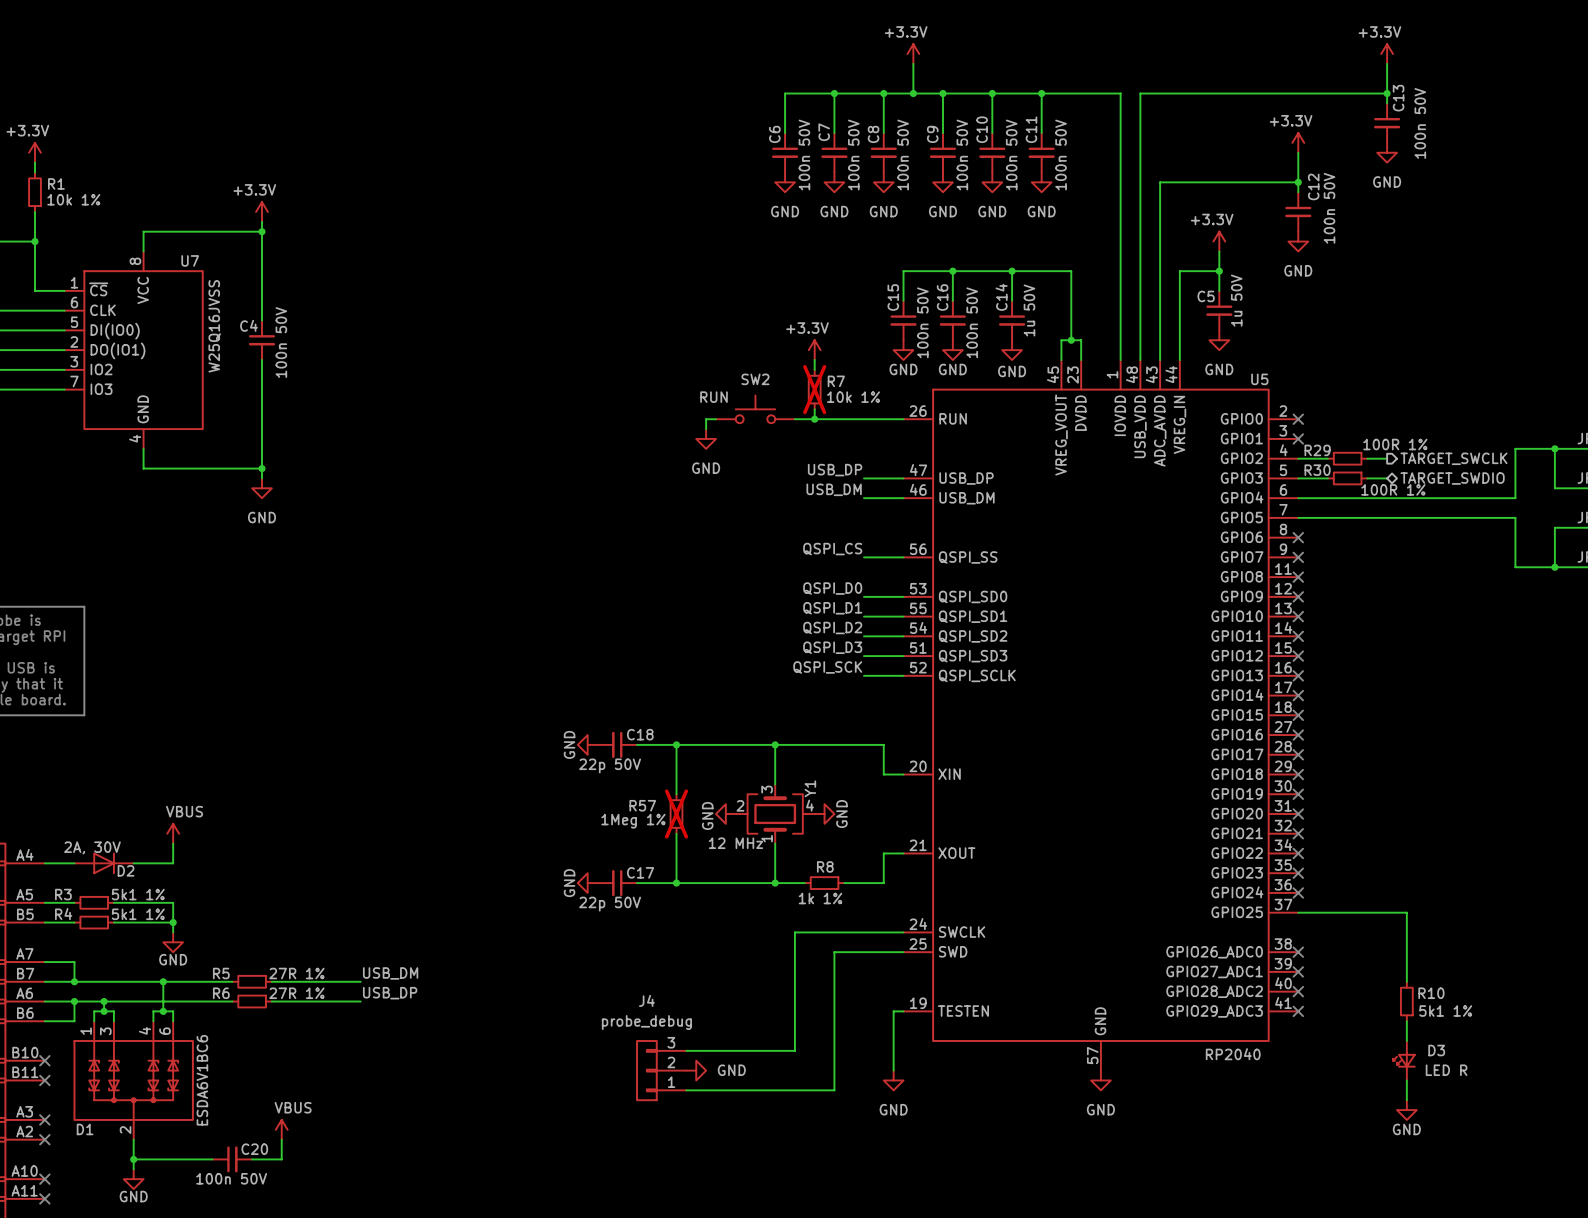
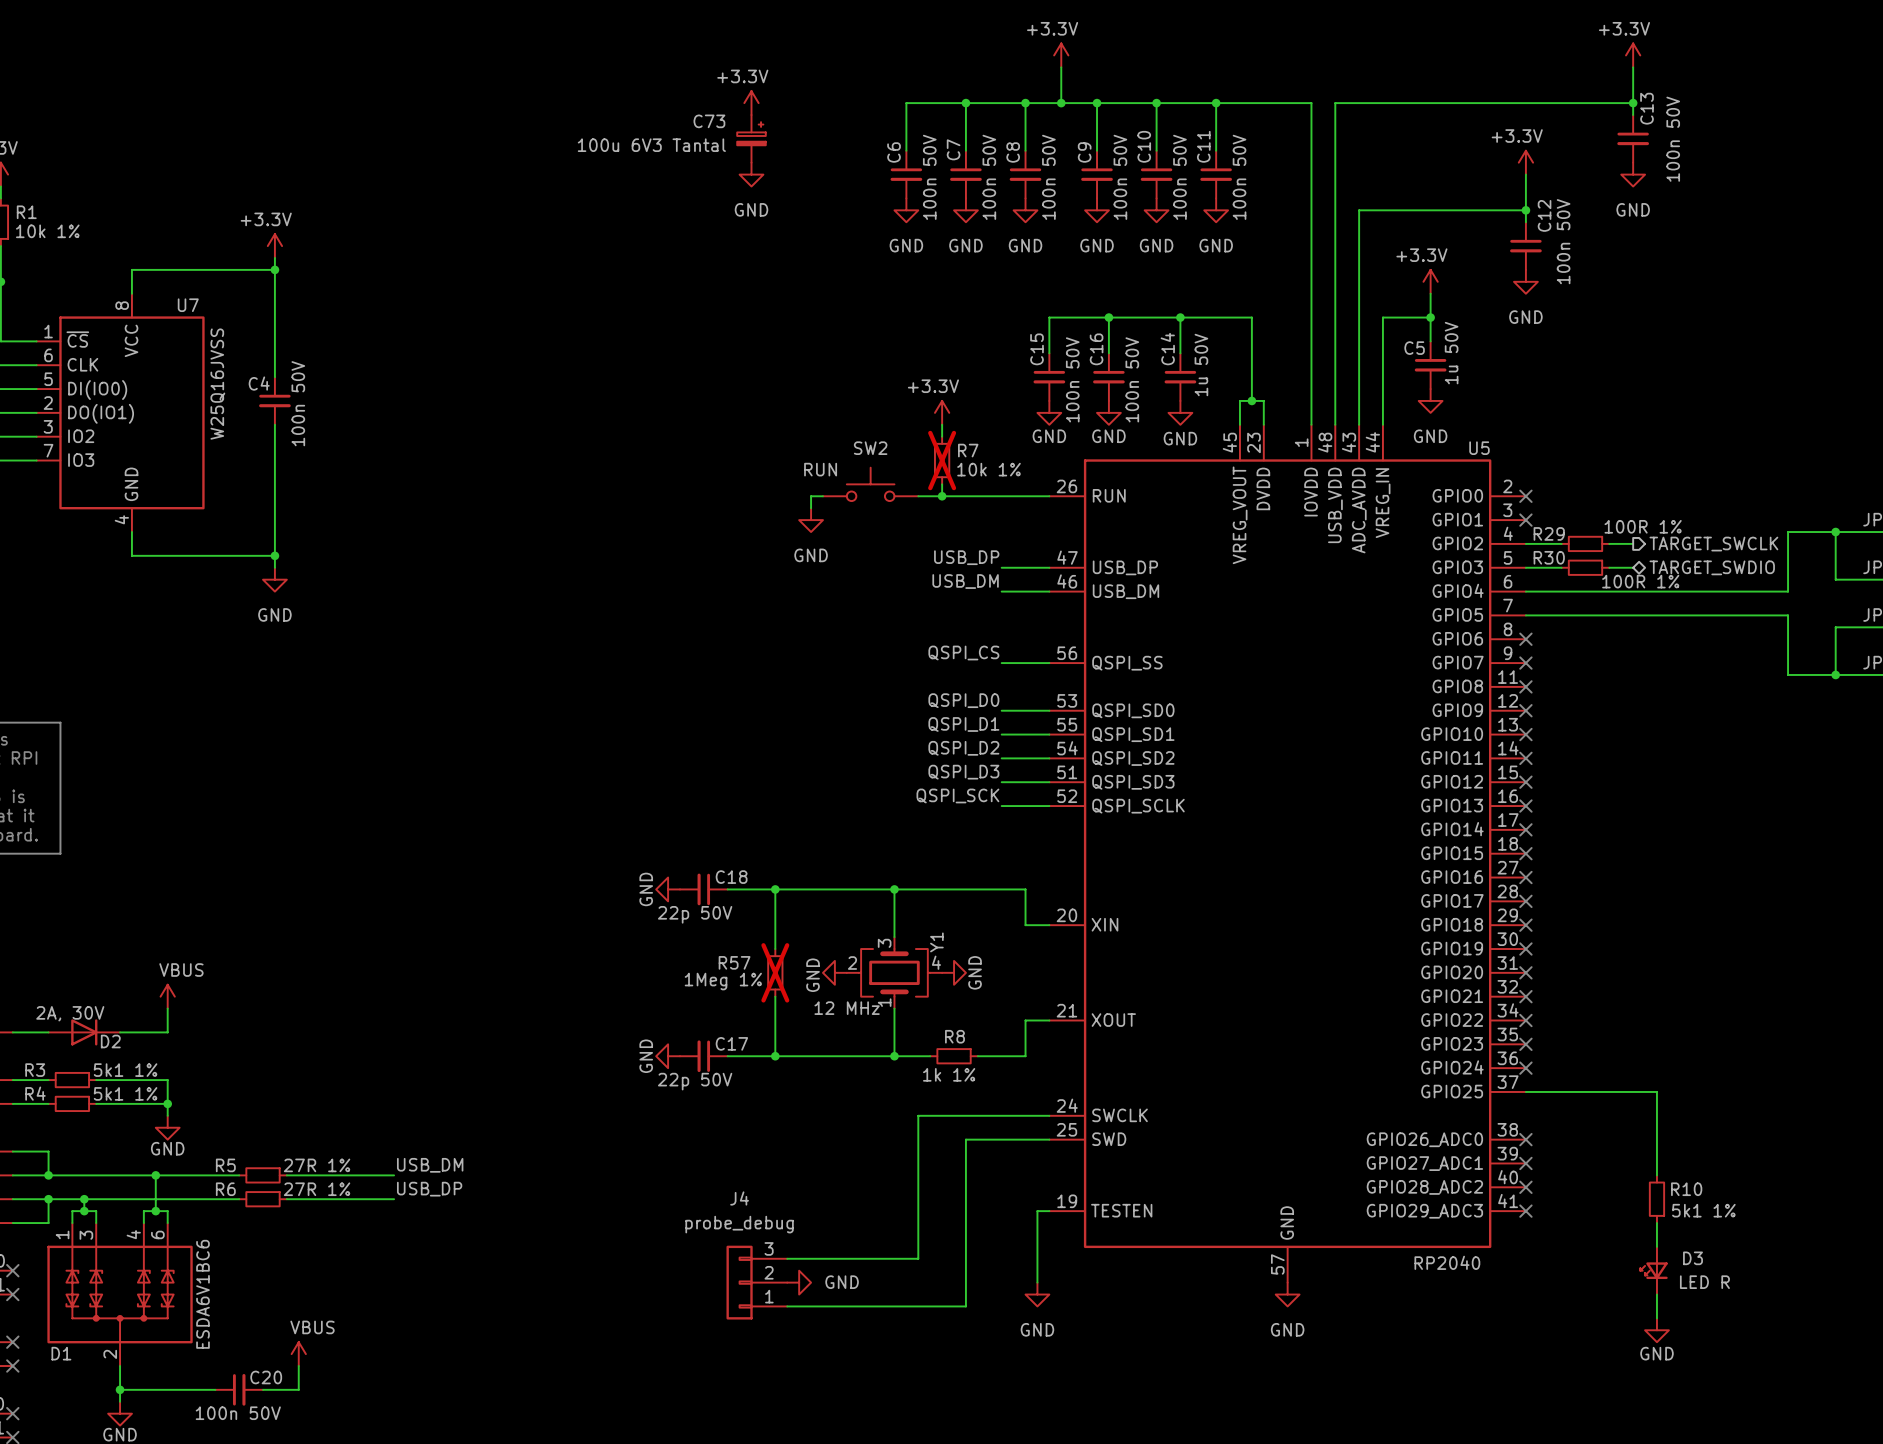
power symbol: none -> +3.3V (751, 103)
C73: none -> 100u 6V3 Tantal (751, 138)
power symbol: none -> GND (751, 174)

